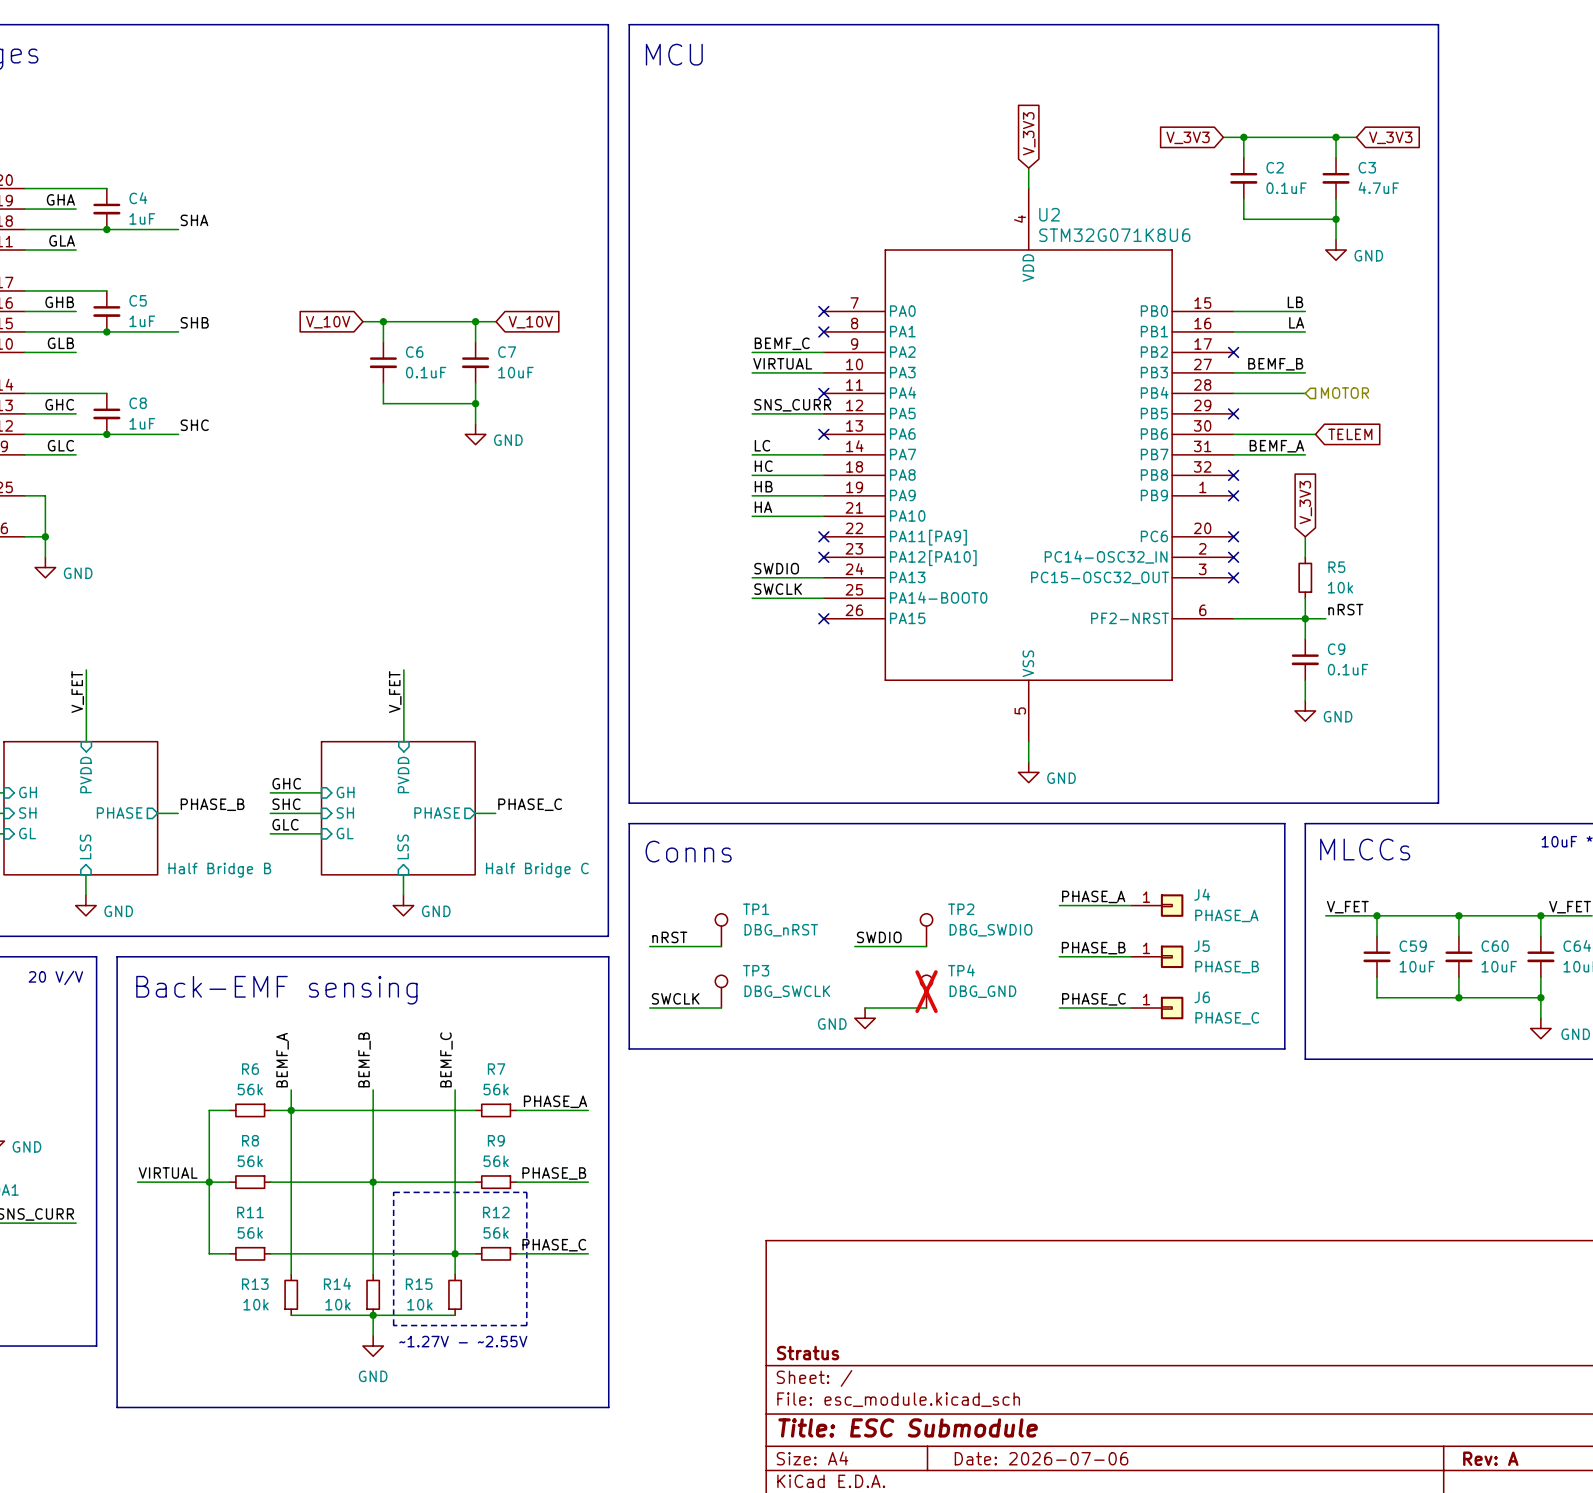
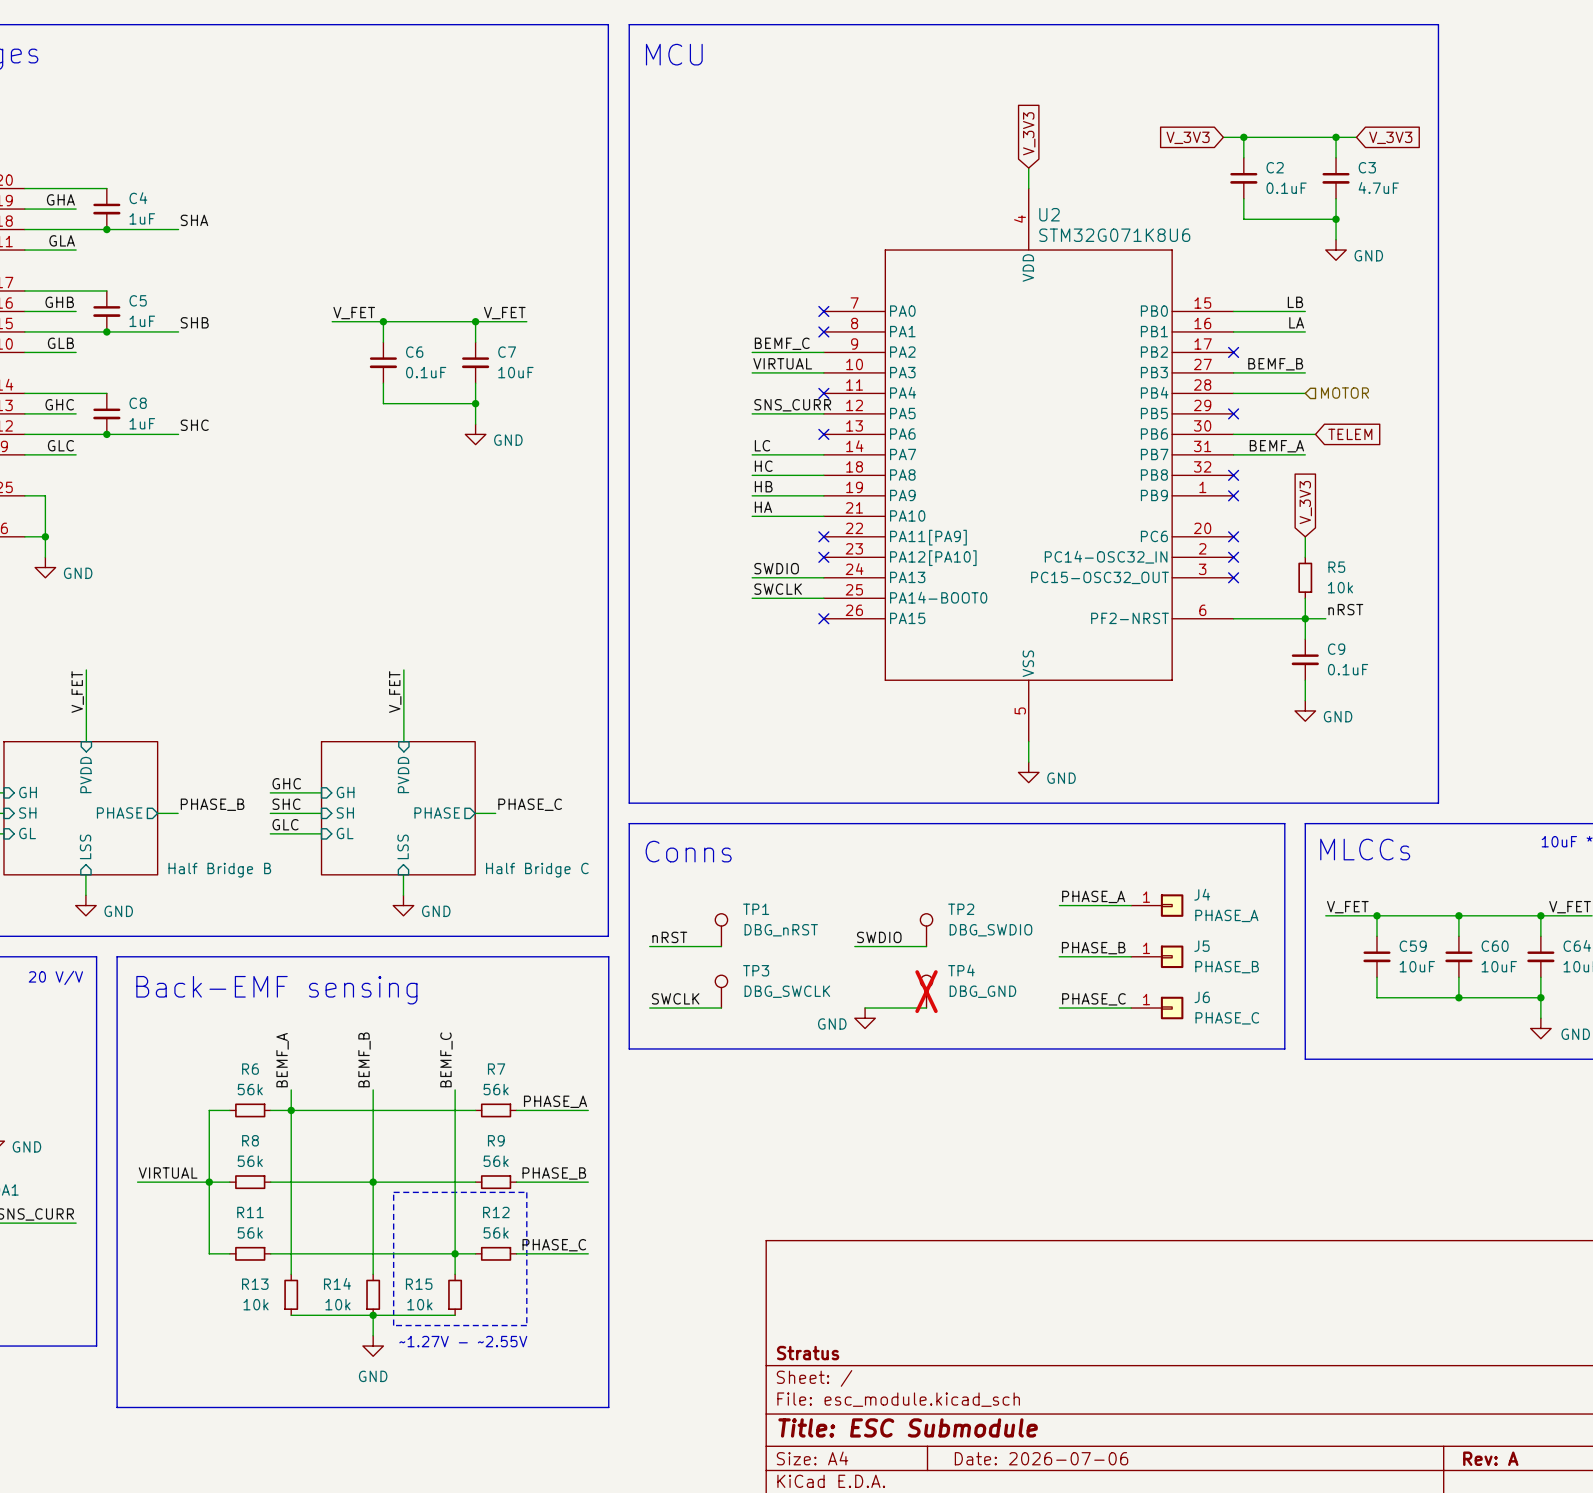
label: none -> V_FET (354, 313)
label: none -> V_FET (504, 313)
wire: none -> (332, 321) (362, 321)
wire: none -> (496, 321) (526, 321)
global label: V_10V (328, 322) -> none
global label: V_10V (530, 322) -> none

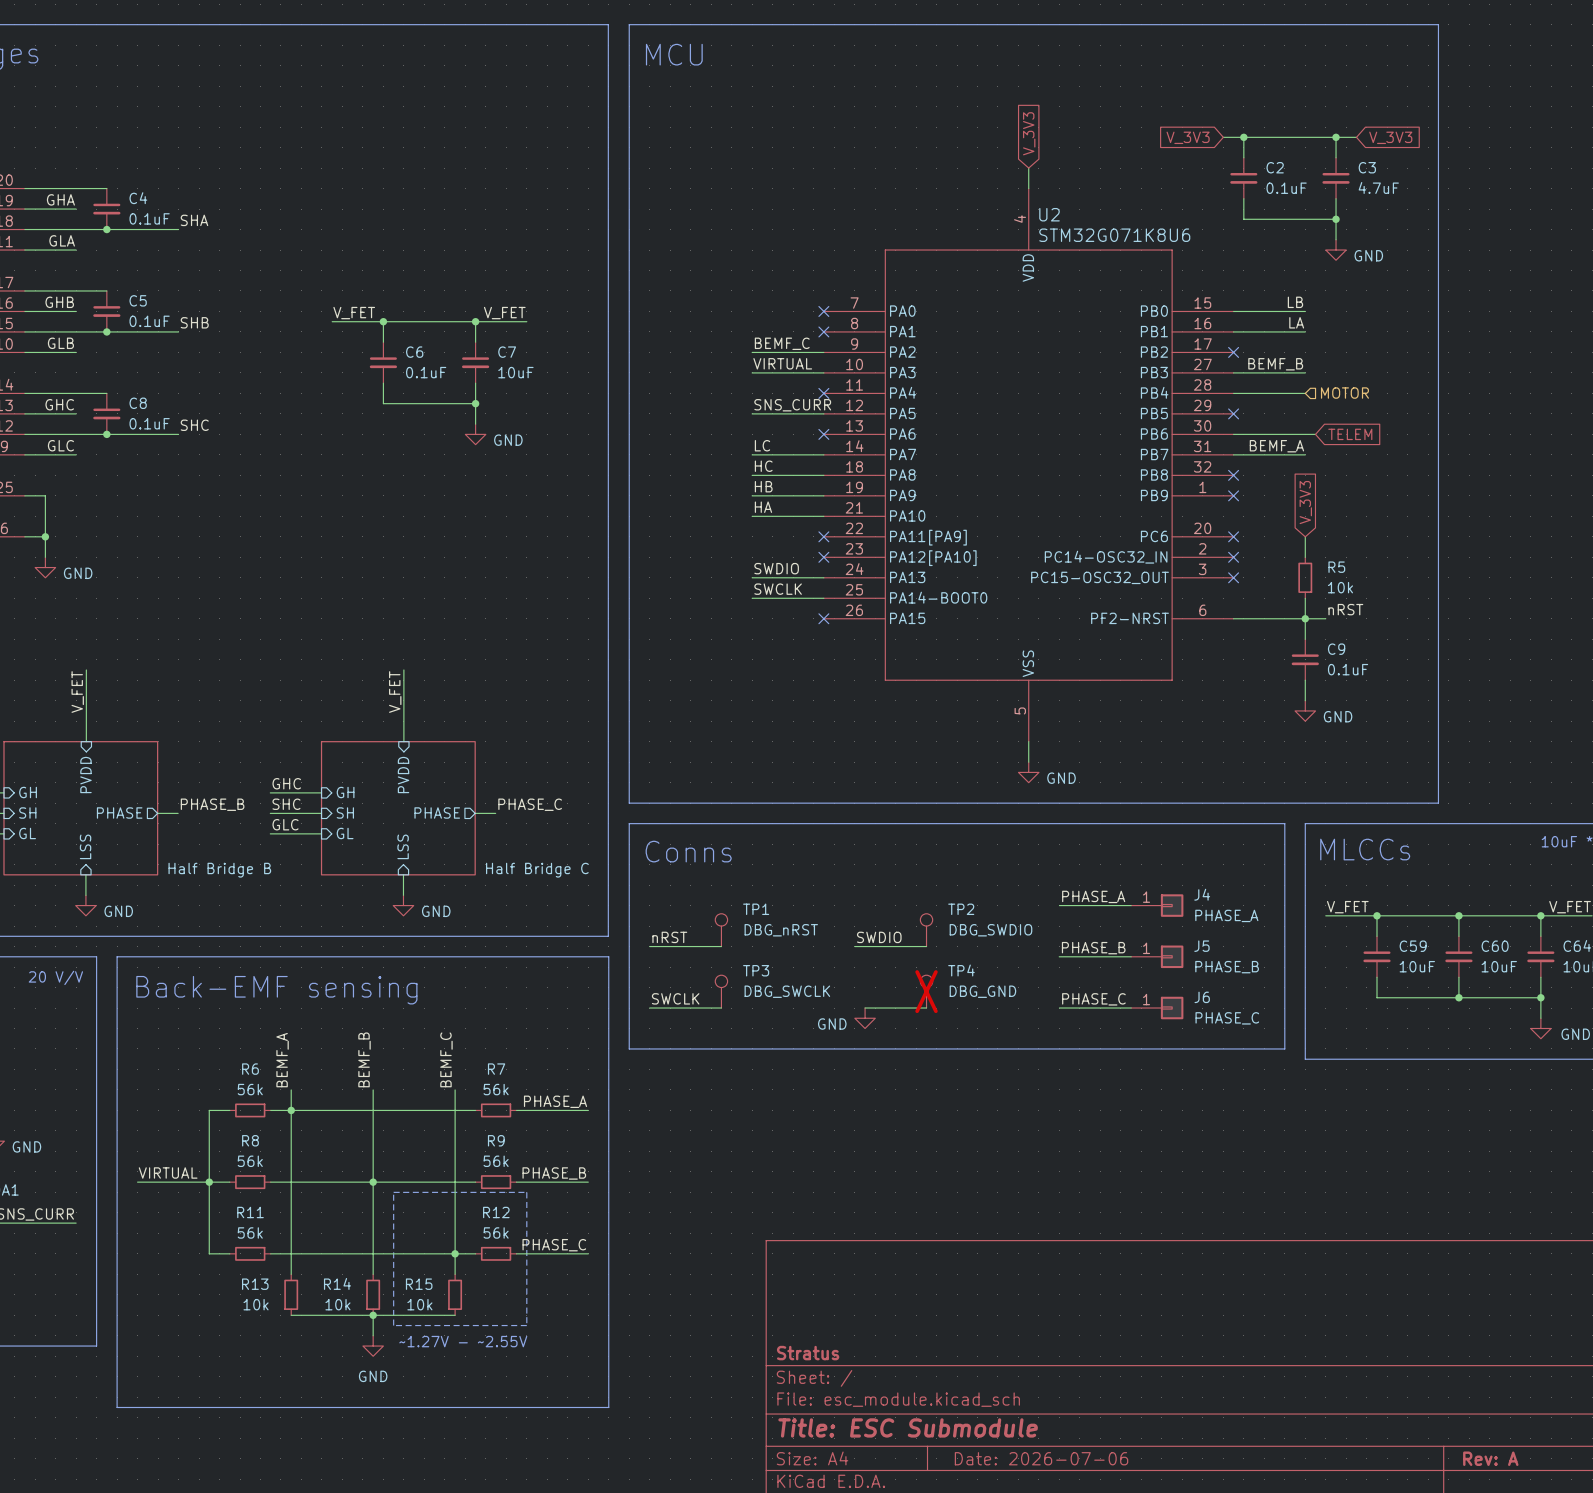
C4 value: 1uF (142, 218) -> 0.1uF (149, 218)
C5 value: 1uF (142, 321) -> 0.1uF (149, 321)
C8 value: 1uF (142, 423) -> 0.1uF (149, 423)

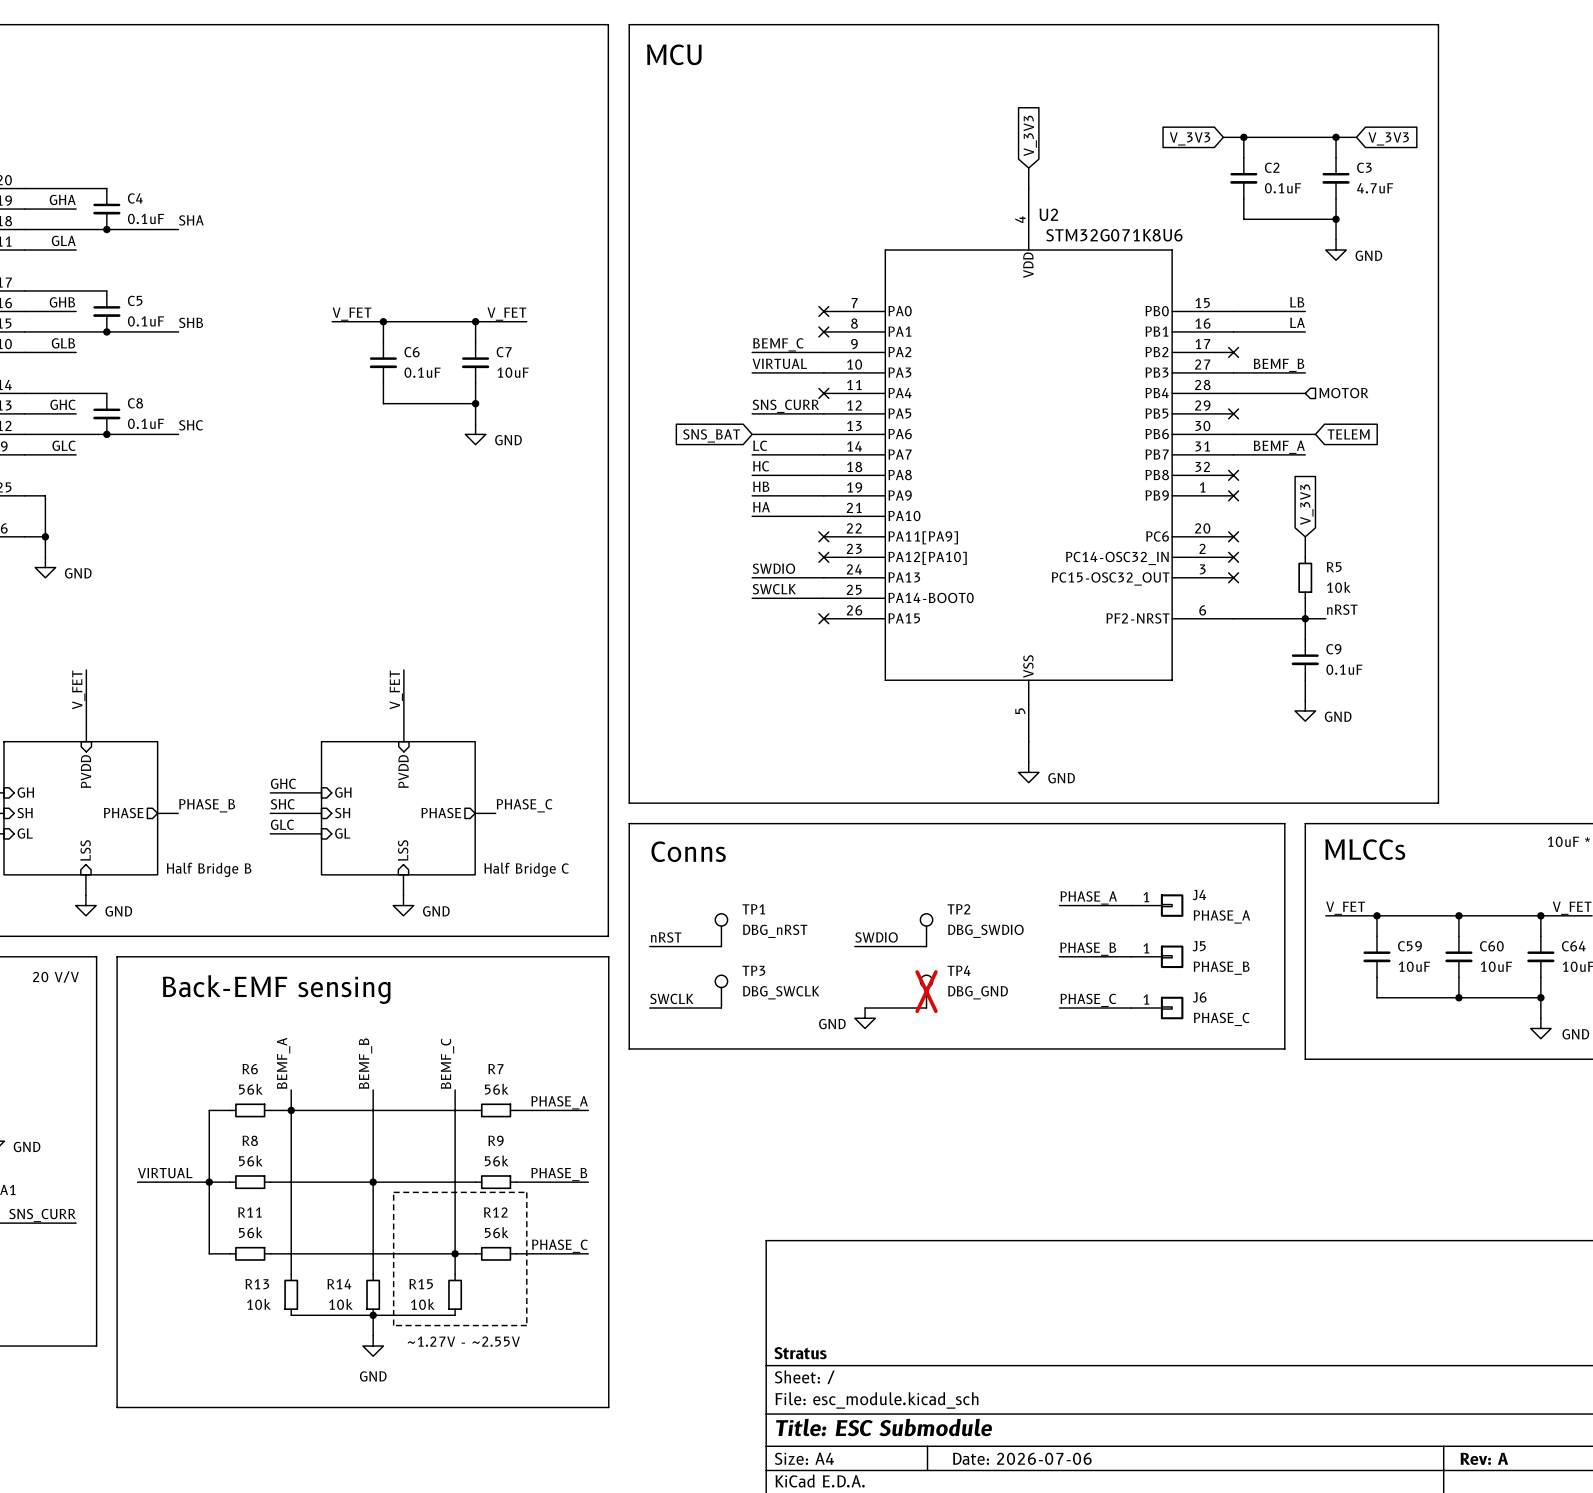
global label: none -> SNS_BAT (711, 435)
wire: none -> (752, 434) (823, 434)
no-connect mark: (823, 434) -> none

